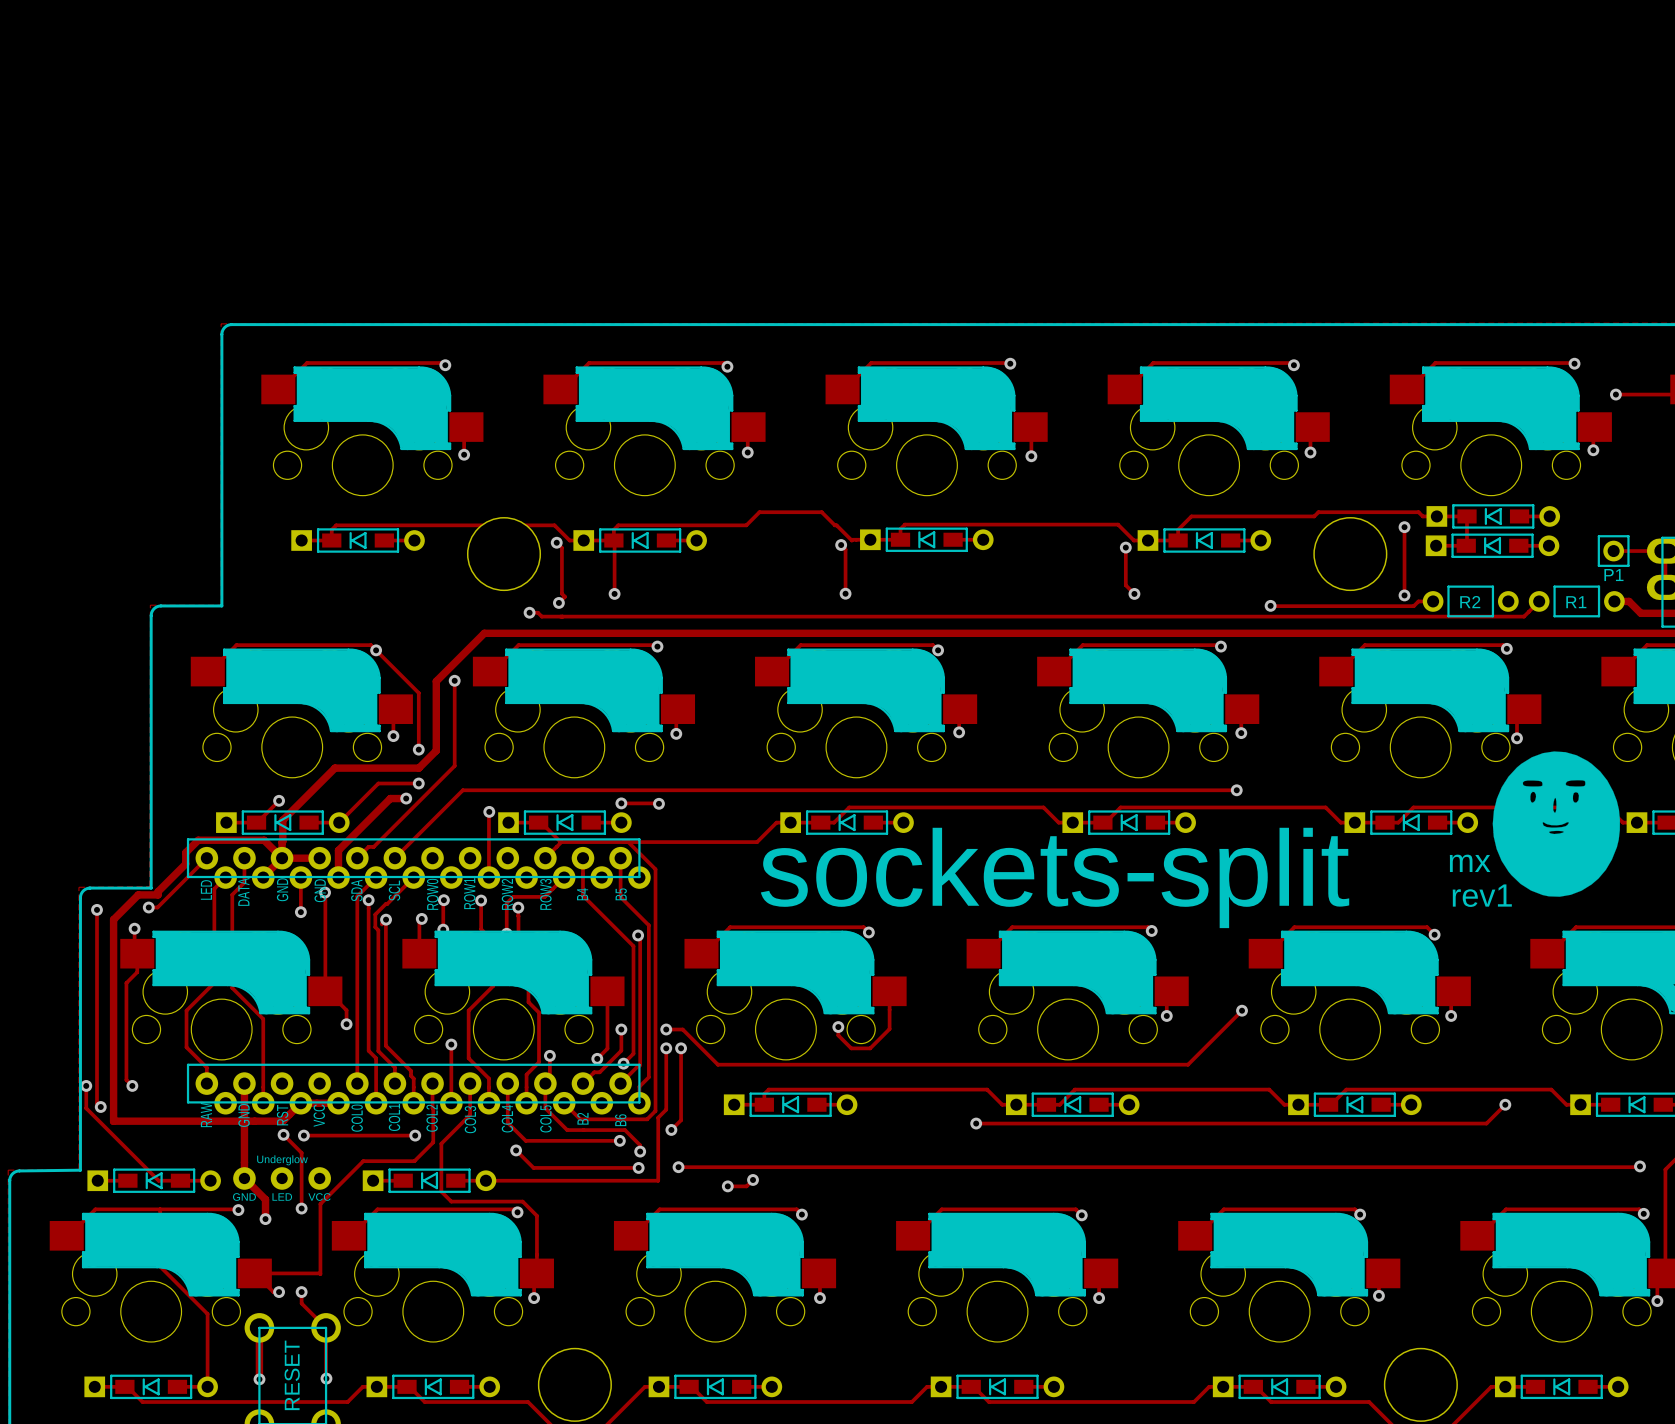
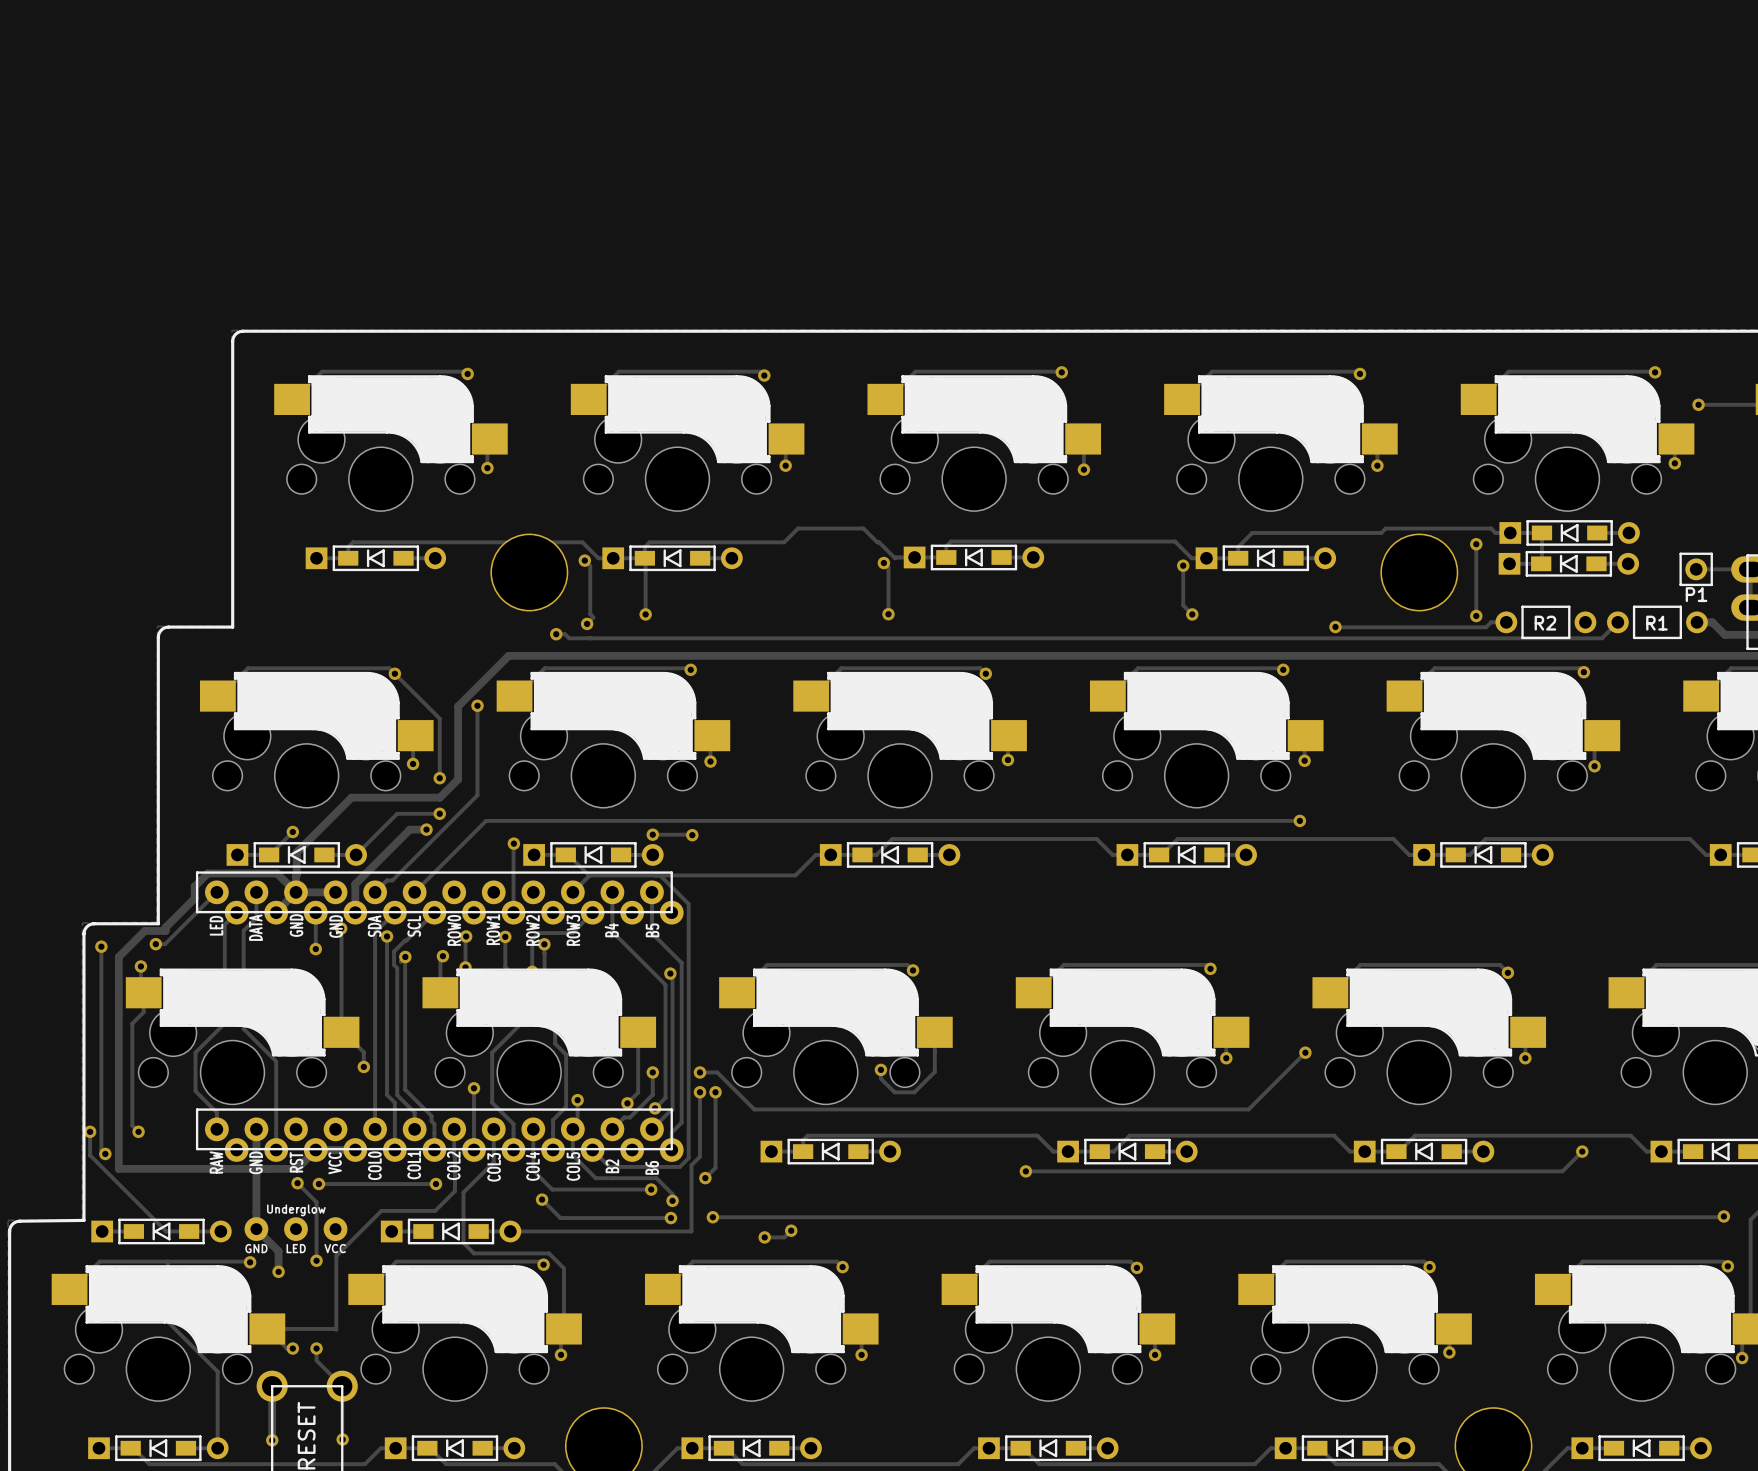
drawing: [1492, 751, 1620, 897] -> none
text: mx (1470, 863) -> none
text: sockets-split (1055, 877) -> none
text: rev1 (1482, 895) -> none

